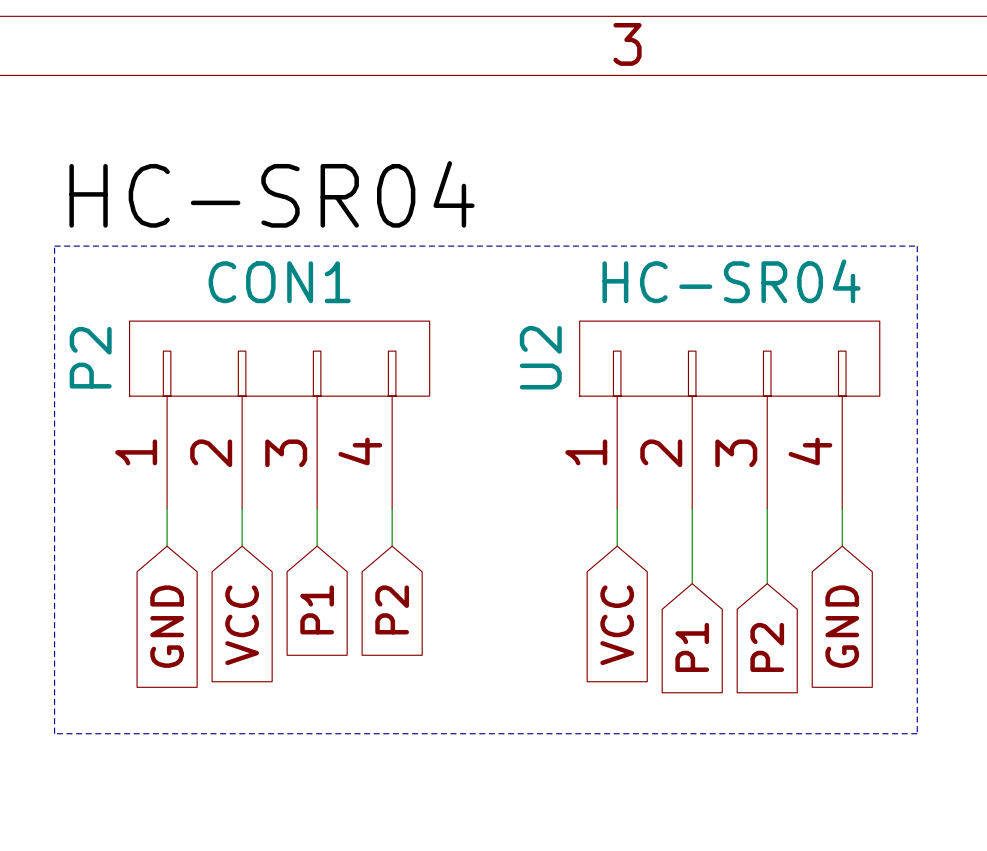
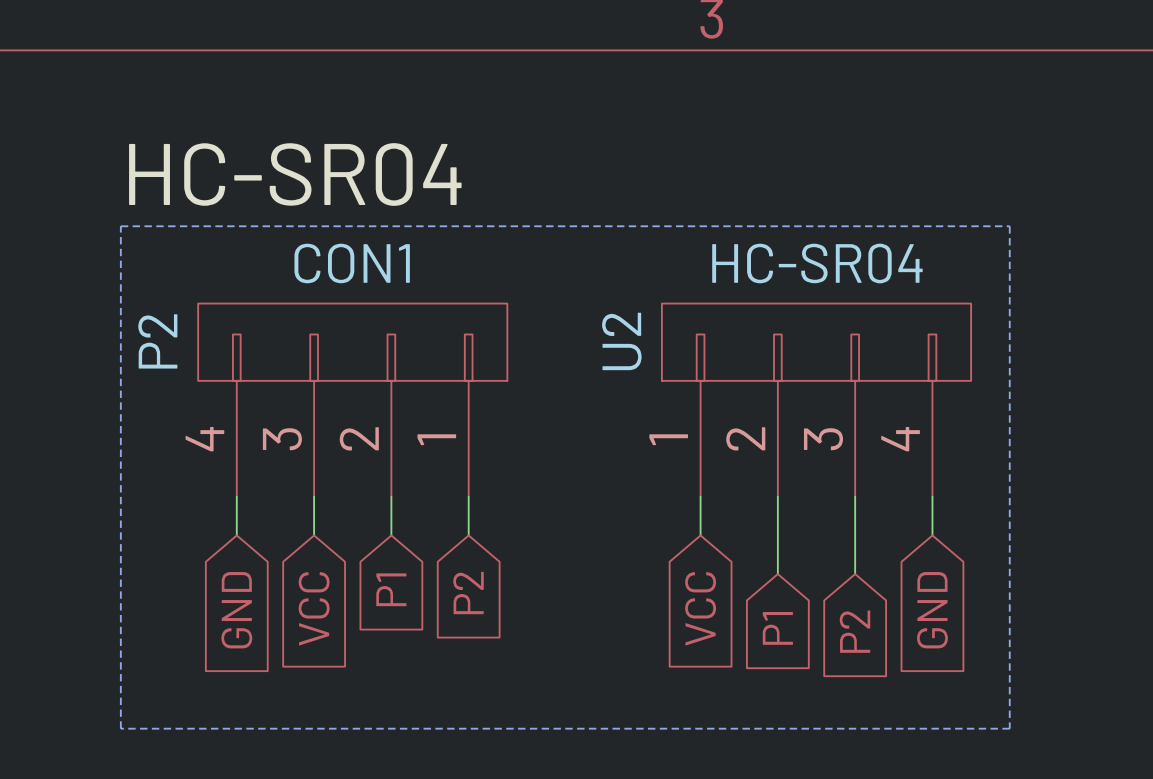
P2 flip: as is (279, 358) -> left-right (352, 342)

